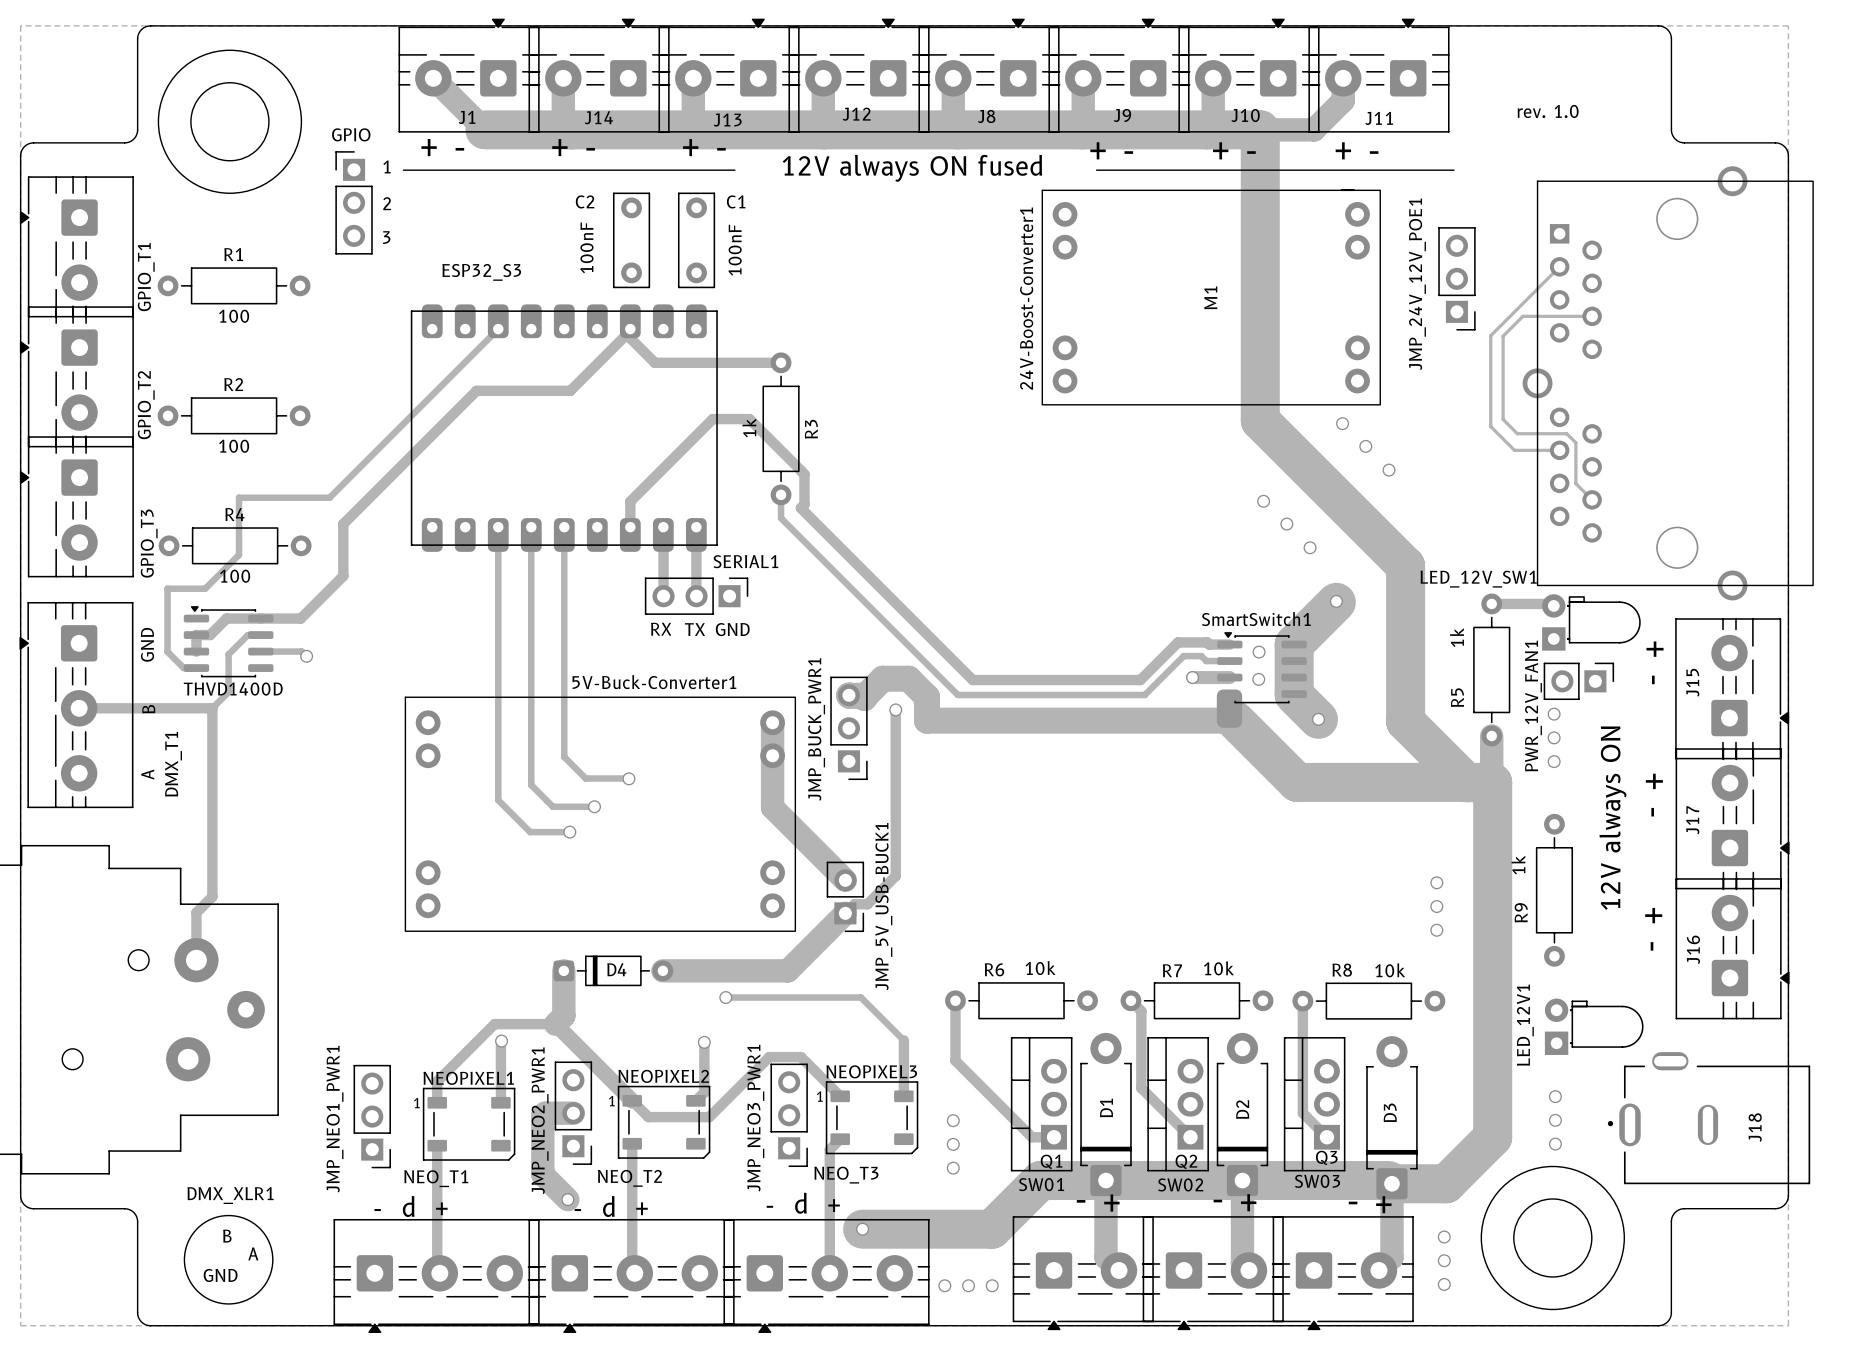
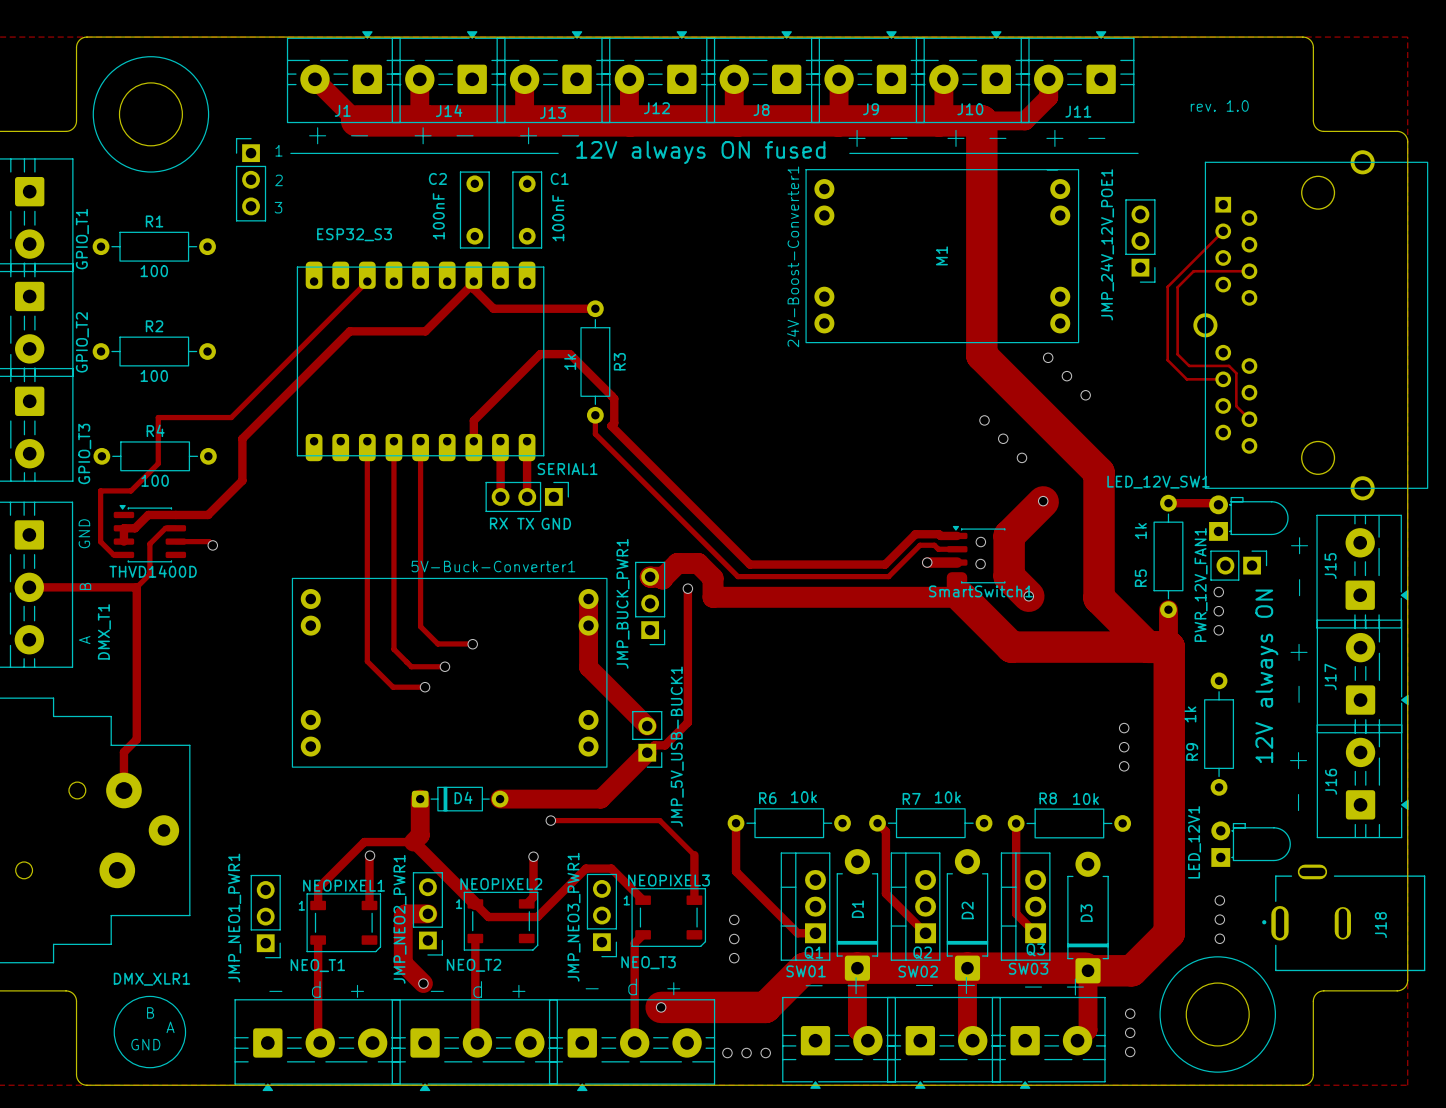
text: GPIO (351, 134) -> none
SmartSwitch1 name position: SmartSwitch1 (1256, 619) -> SmartSwitch1 (980, 591)

